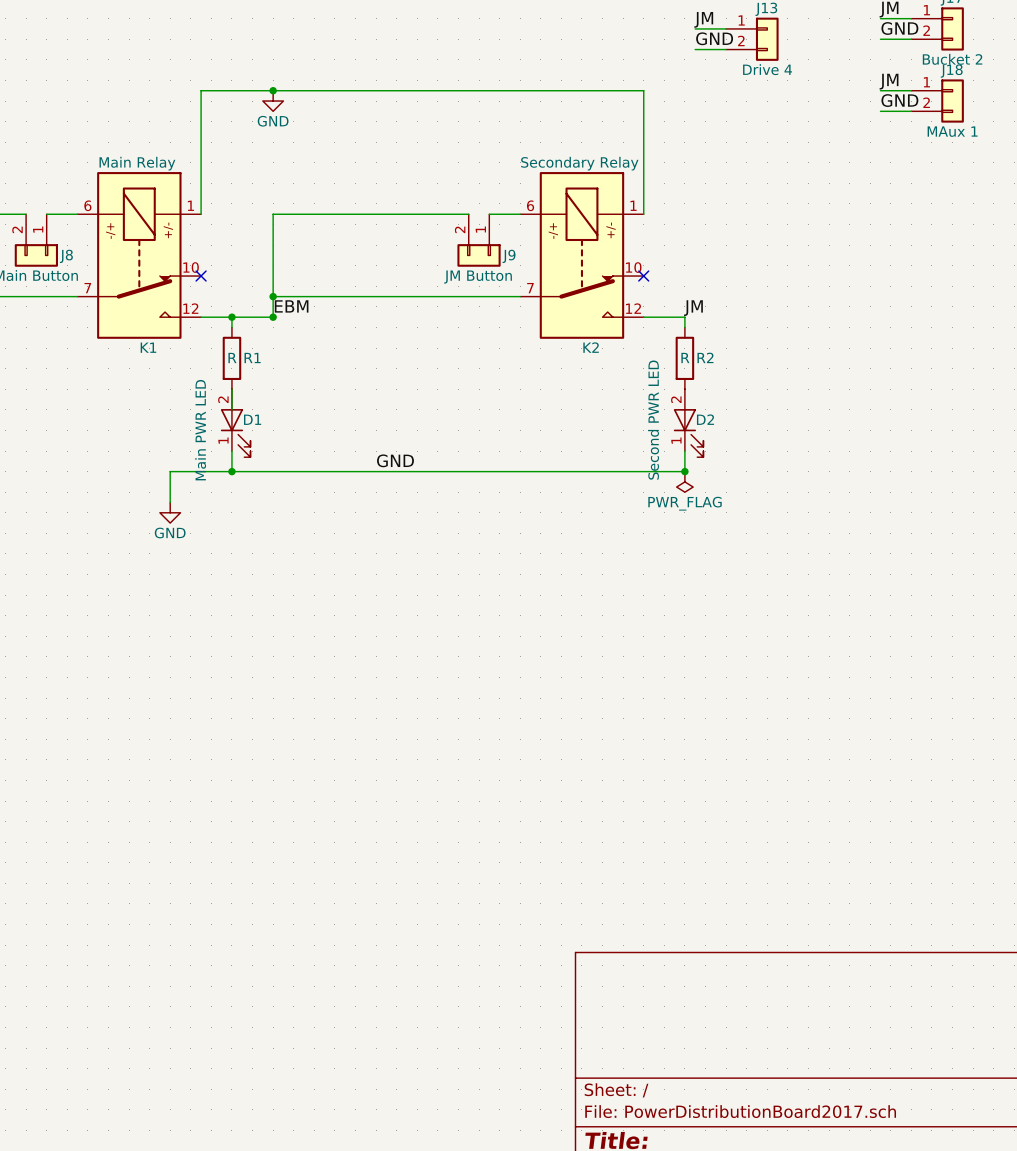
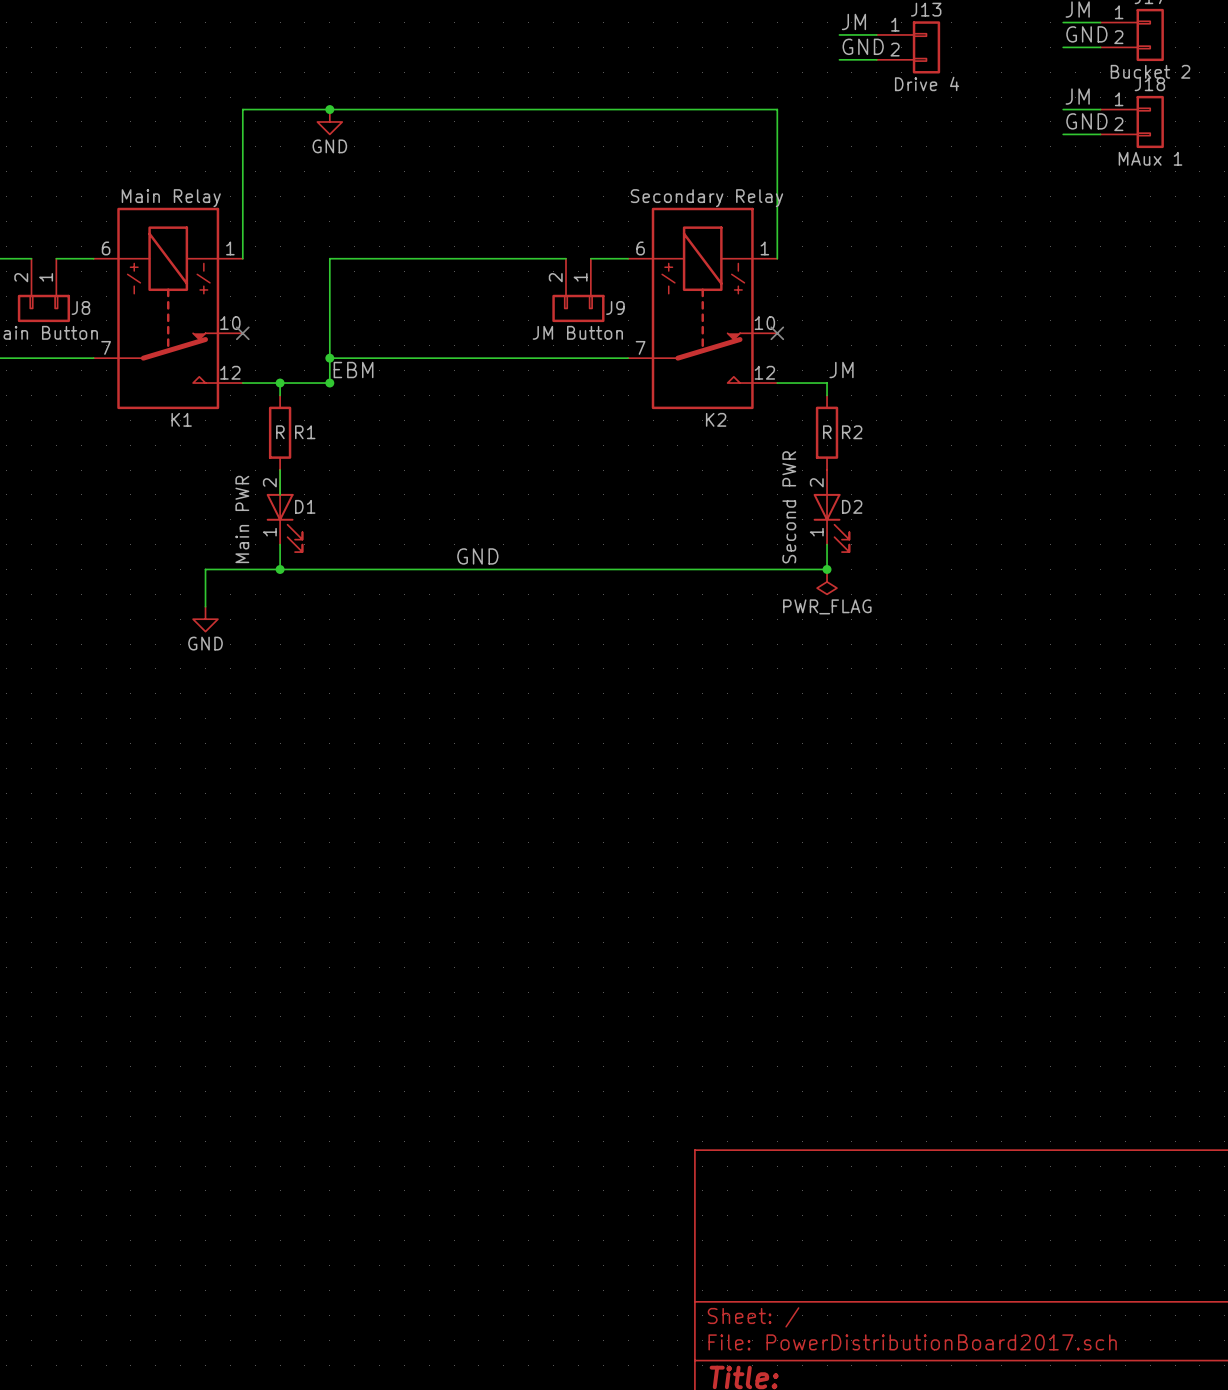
D2 value: Second PWR LED (653, 420) -> Second PWR (789, 507)
D1 value: Main PWR LED (200, 430) -> Main PWR (242, 519)

